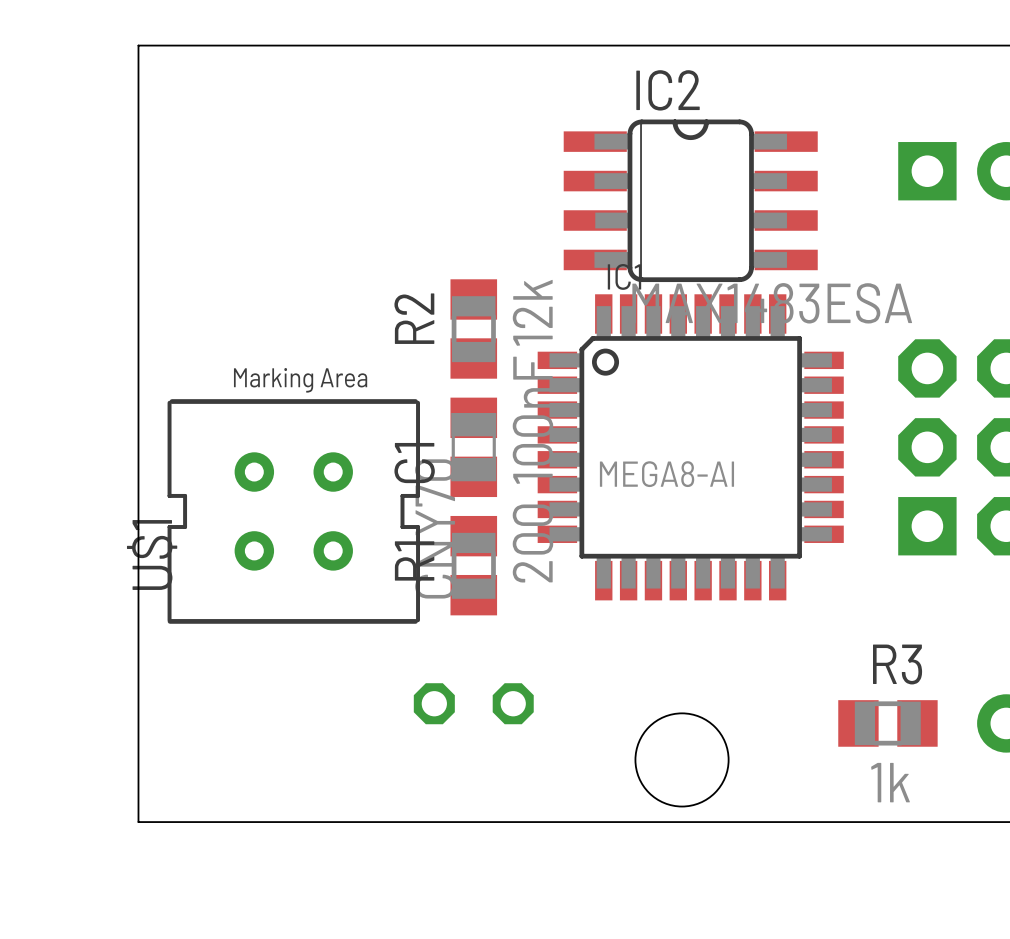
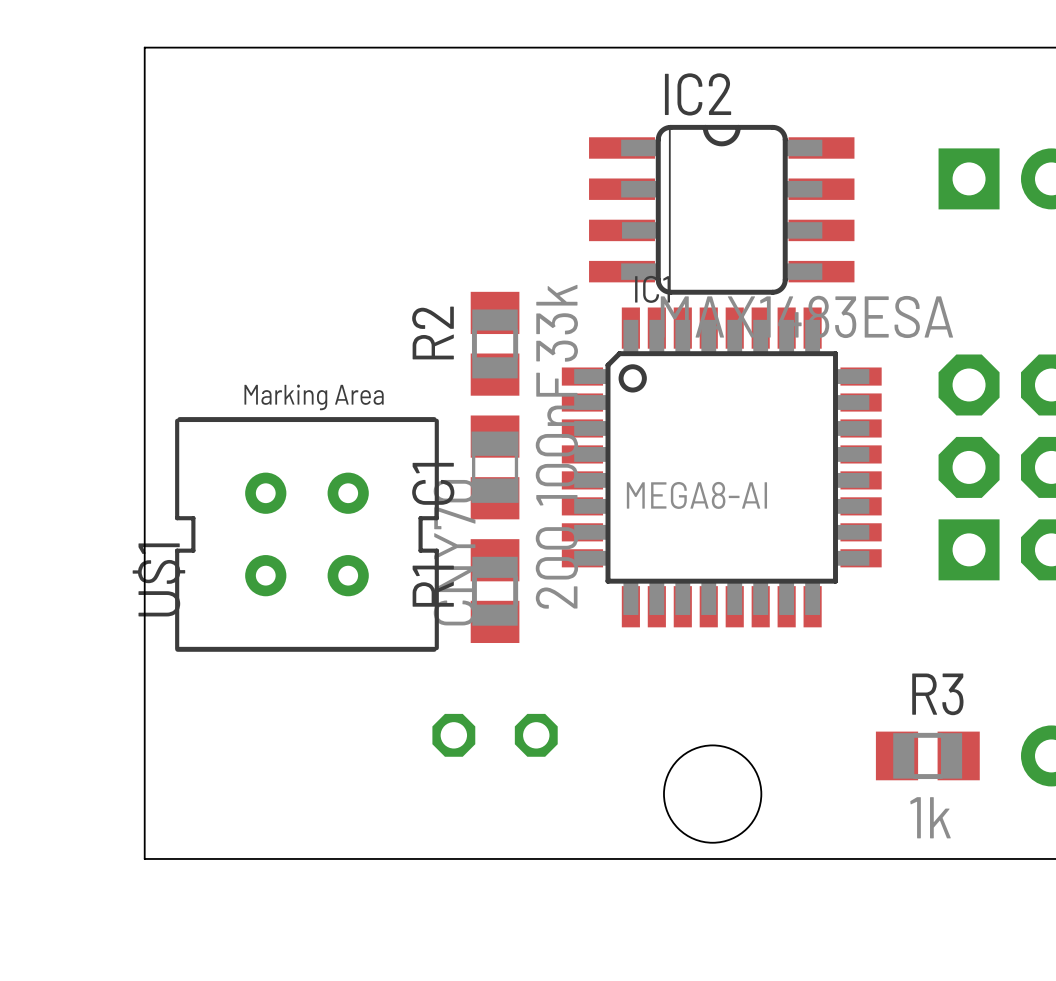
R2 value: 12k (532, 312) -> 33k (557, 323)

